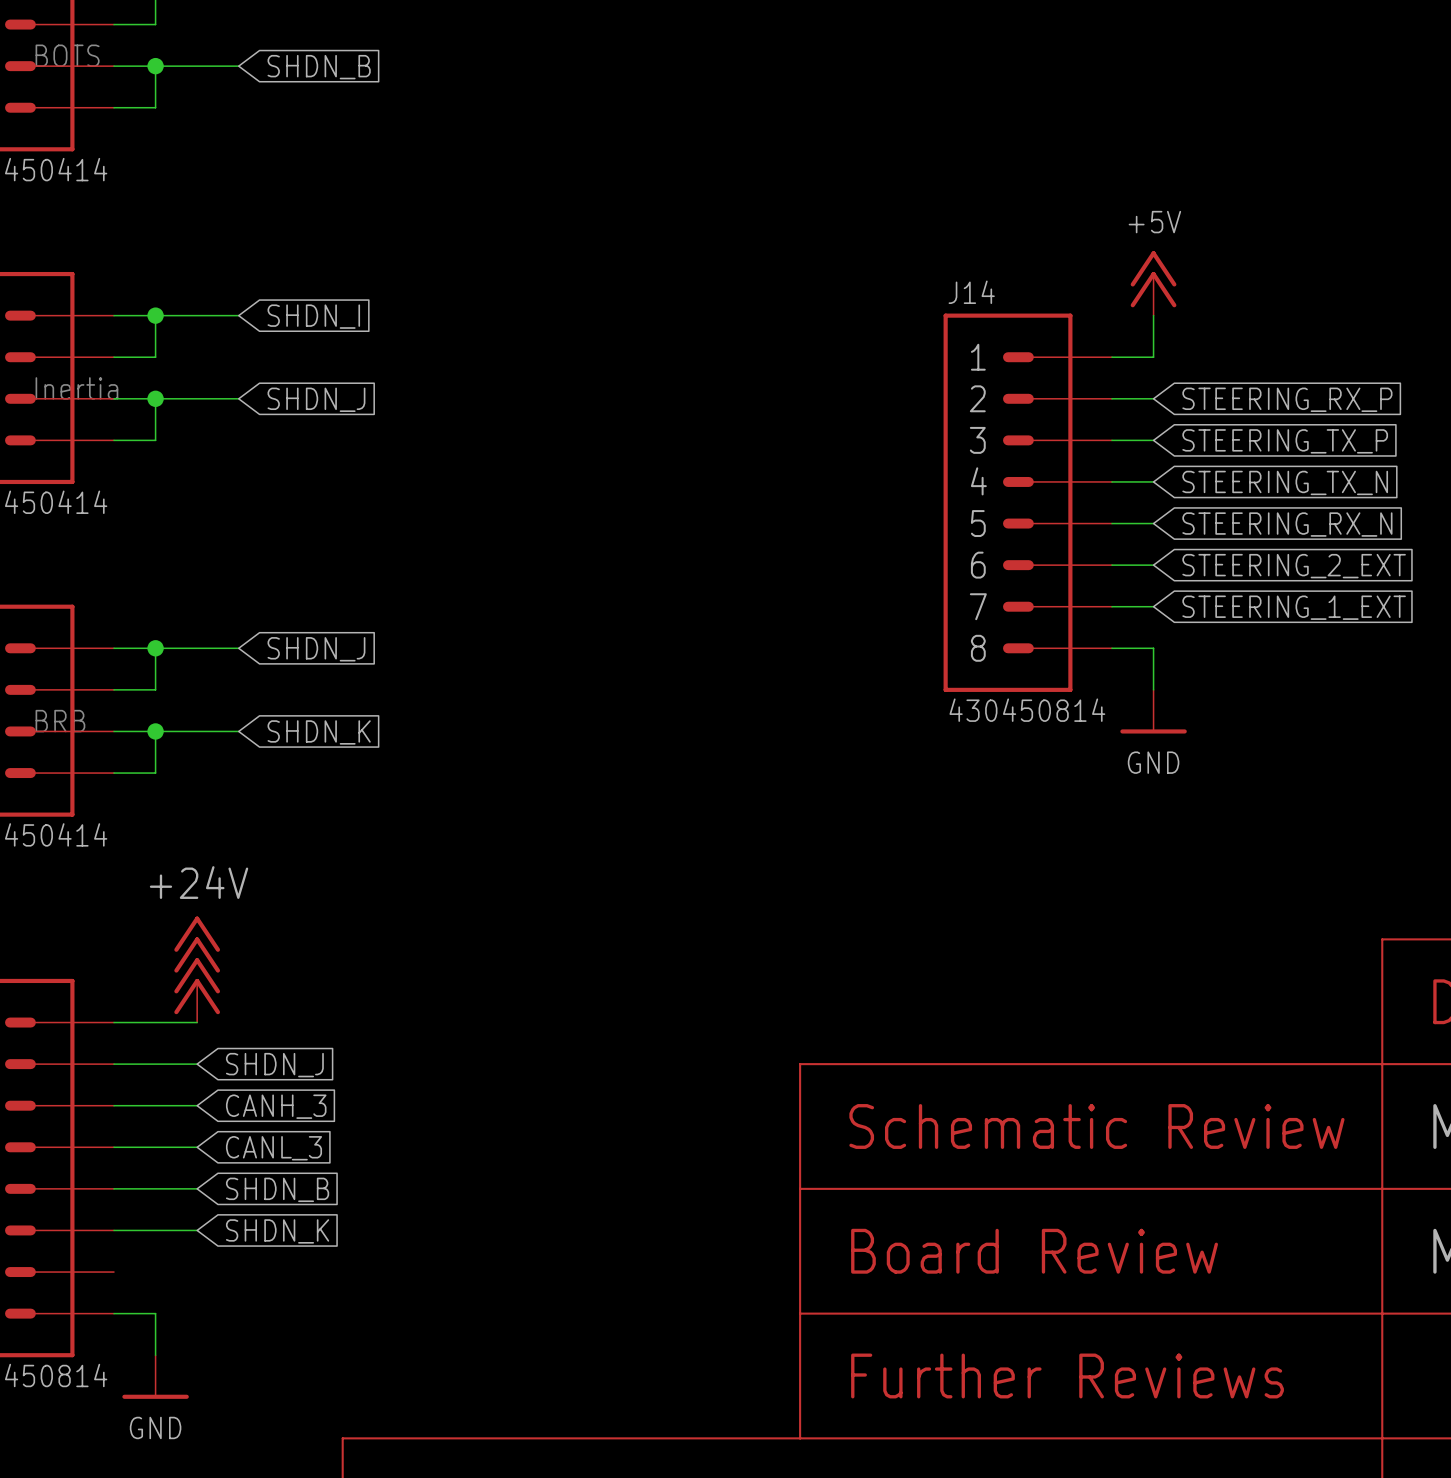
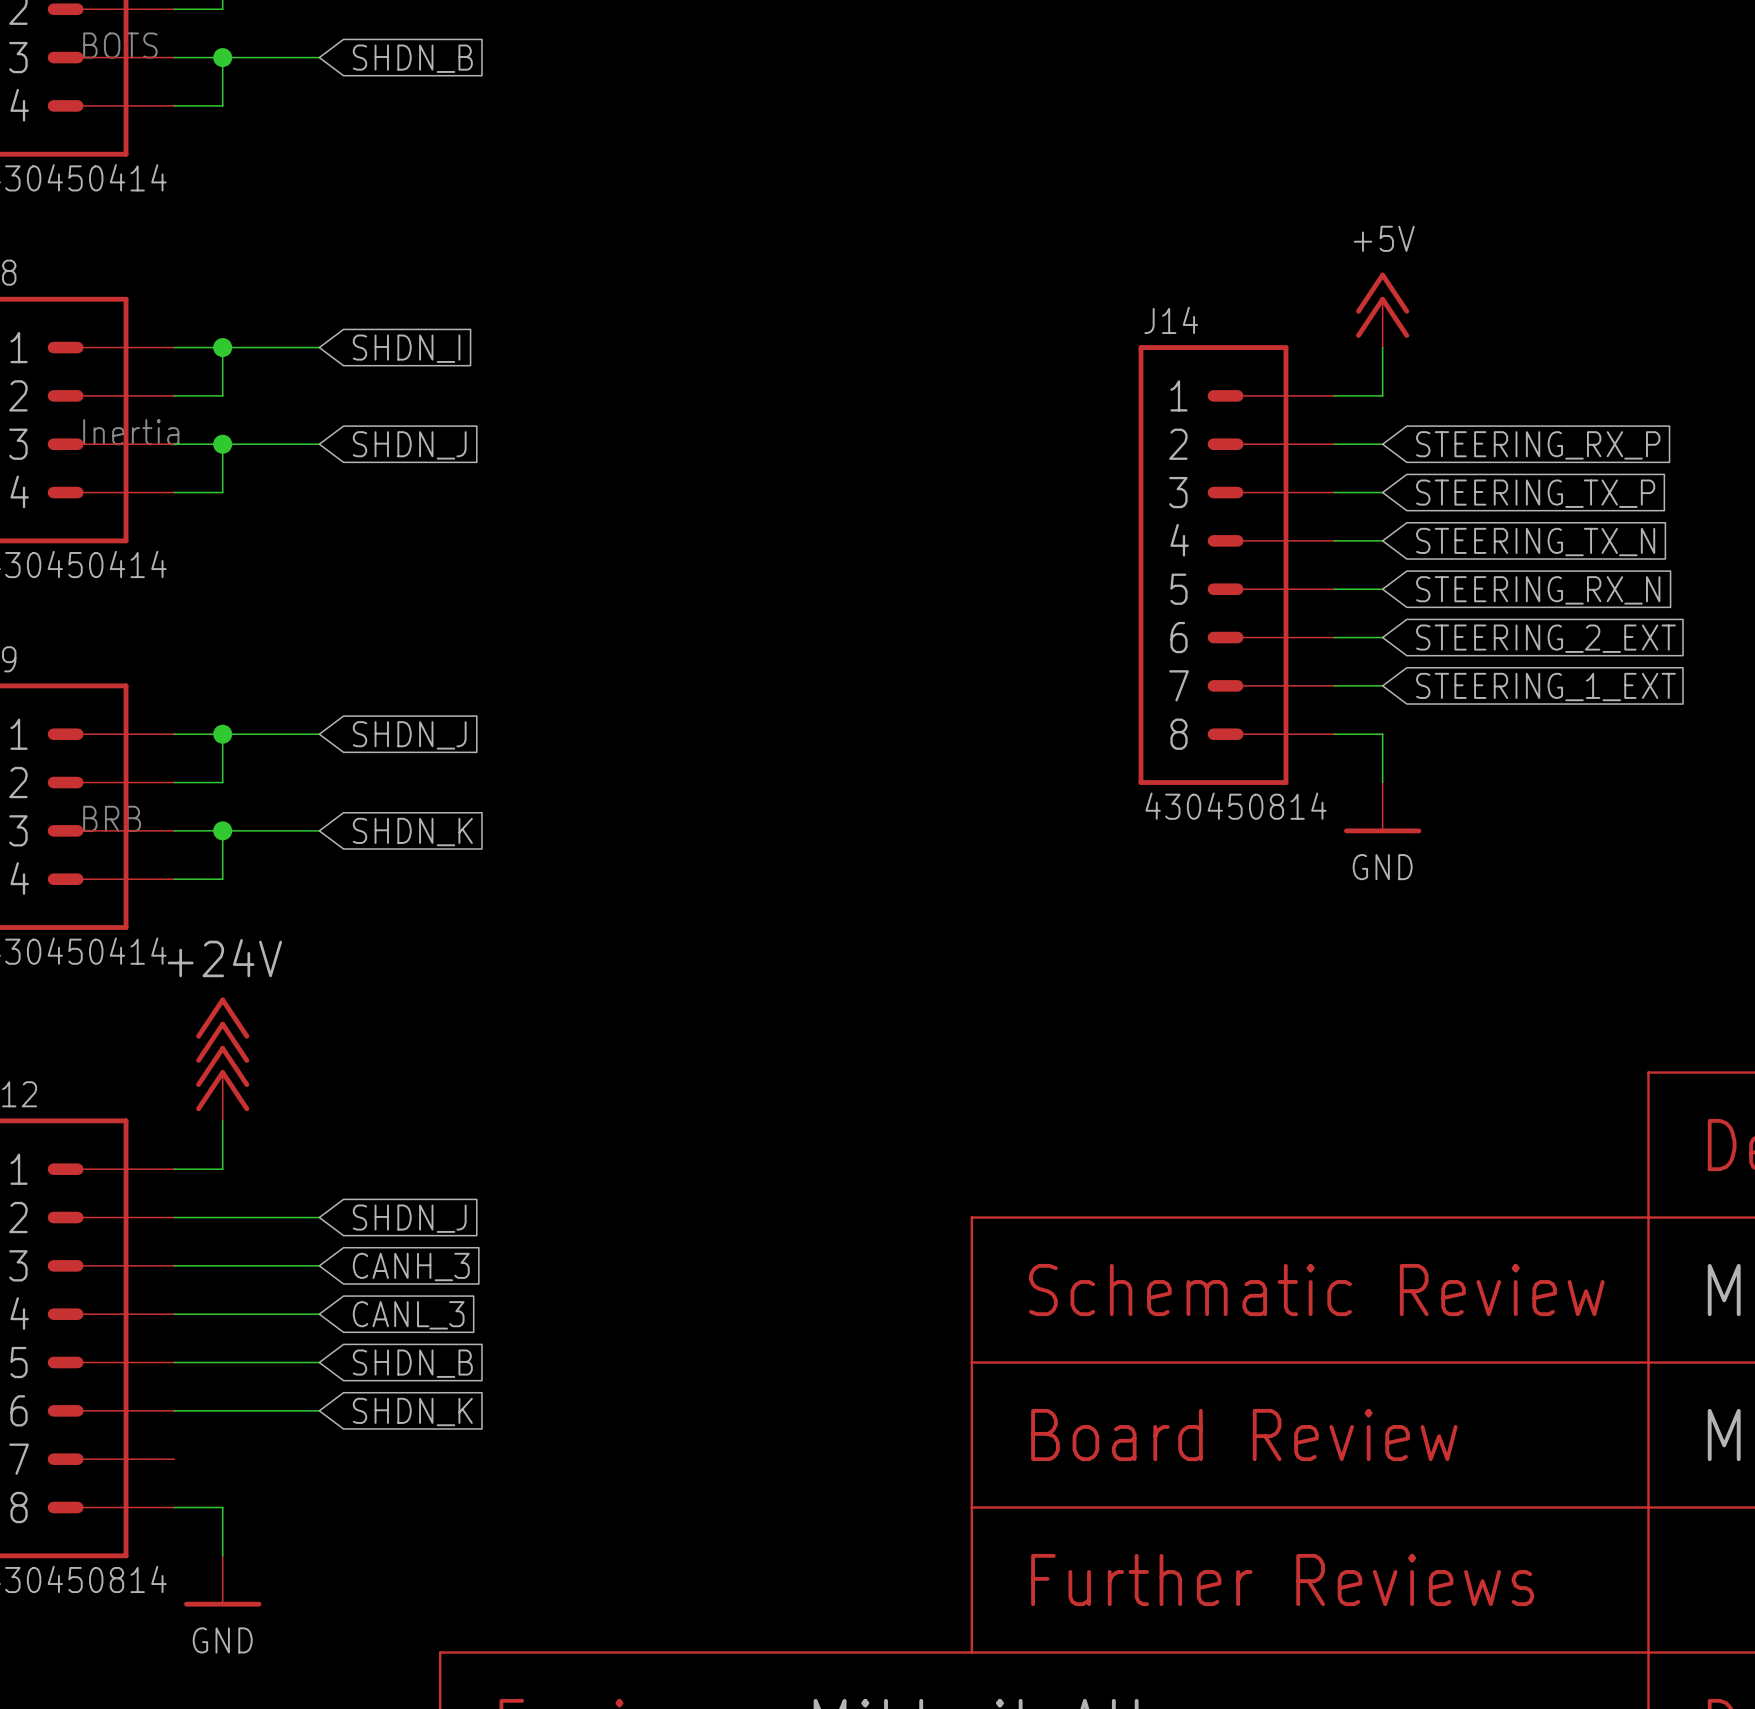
power symbol position: +24V (197, 969) -> +24V (222, 1059)
wire: (155, 1022) (197, 1022) -> (222, 1169) (222, 1120)
wire: none -> (271, 1217) (319, 1217)
global label position: SHDN_J (274, 1065) -> SHDN_J (409, 1218)
wire: none -> (271, 1265) (319, 1265)
global label position: CANH_3 (276, 1106) -> CANH_3 (411, 1267)
wire: none -> (271, 1314) (319, 1314)
global label position: CANL_3 (273, 1148) -> CANL_3 (408, 1315)
wire: none -> (271, 1362) (319, 1362)
global label position: SHDN_B (277, 1189) -> SHDN_B (412, 1363)
wire: none -> (271, 1410) (319, 1410)
global label position: SHDN_K (277, 1231) -> SHDN_K (412, 1412)

